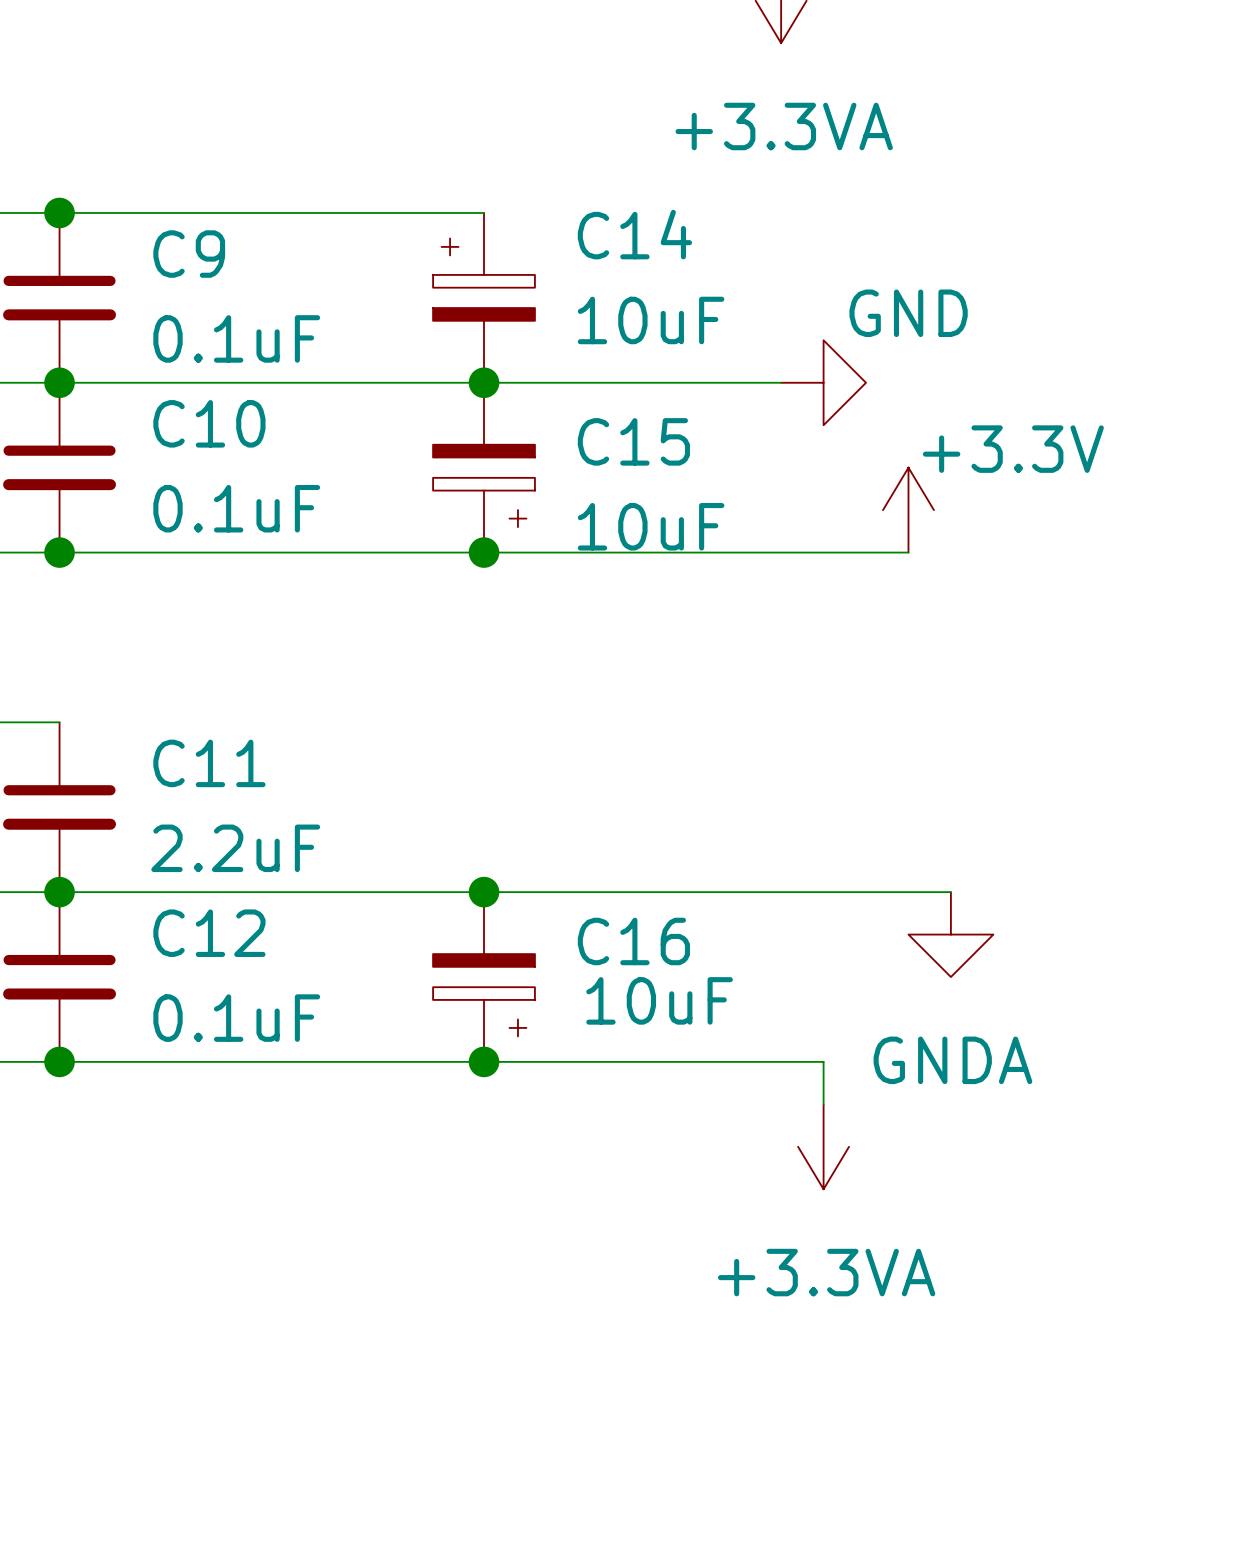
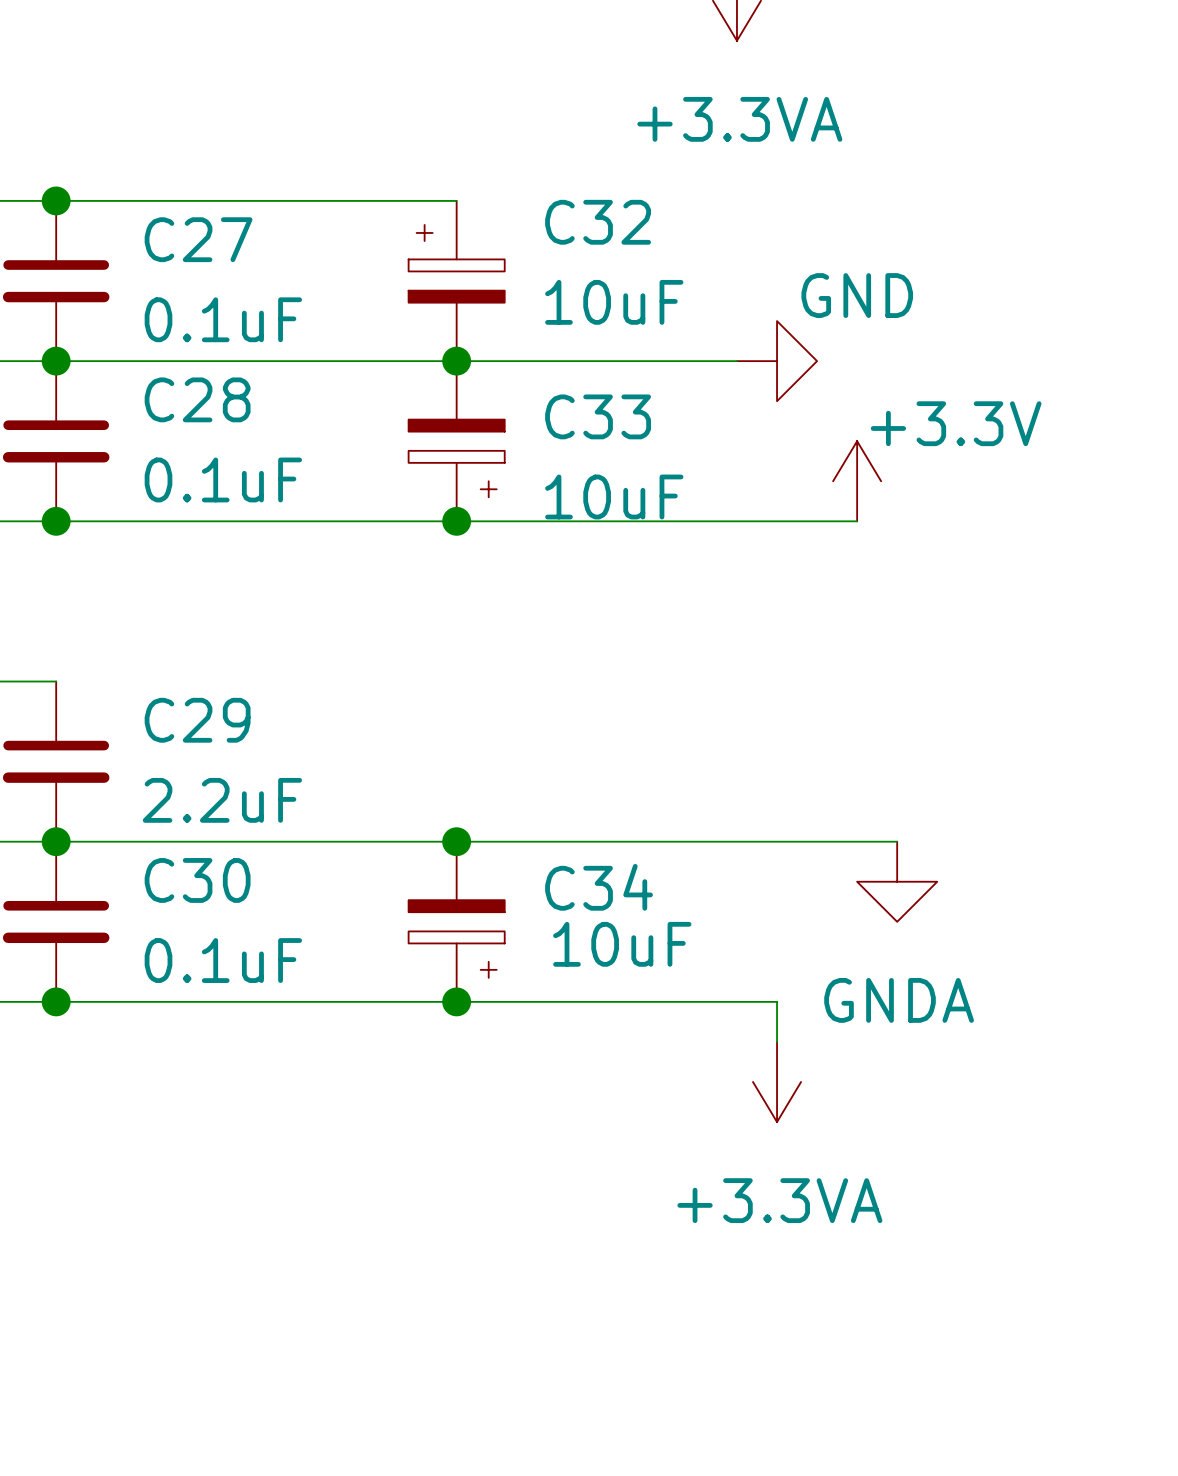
C14 name: C14 (634, 234) -> C32 (598, 222)
C9 name: C9 (189, 254) -> C27 (198, 239)
C10 name: C10 (209, 423) -> C28 (197, 399)
C15 name: C15 (633, 441) -> C33 (598, 416)
C11 name: C11 (209, 763) -> C29 (197, 720)
C12 name: C12 (209, 933) -> C30 (197, 880)
C16 name: C16 (633, 941) -> C34 (599, 887)

